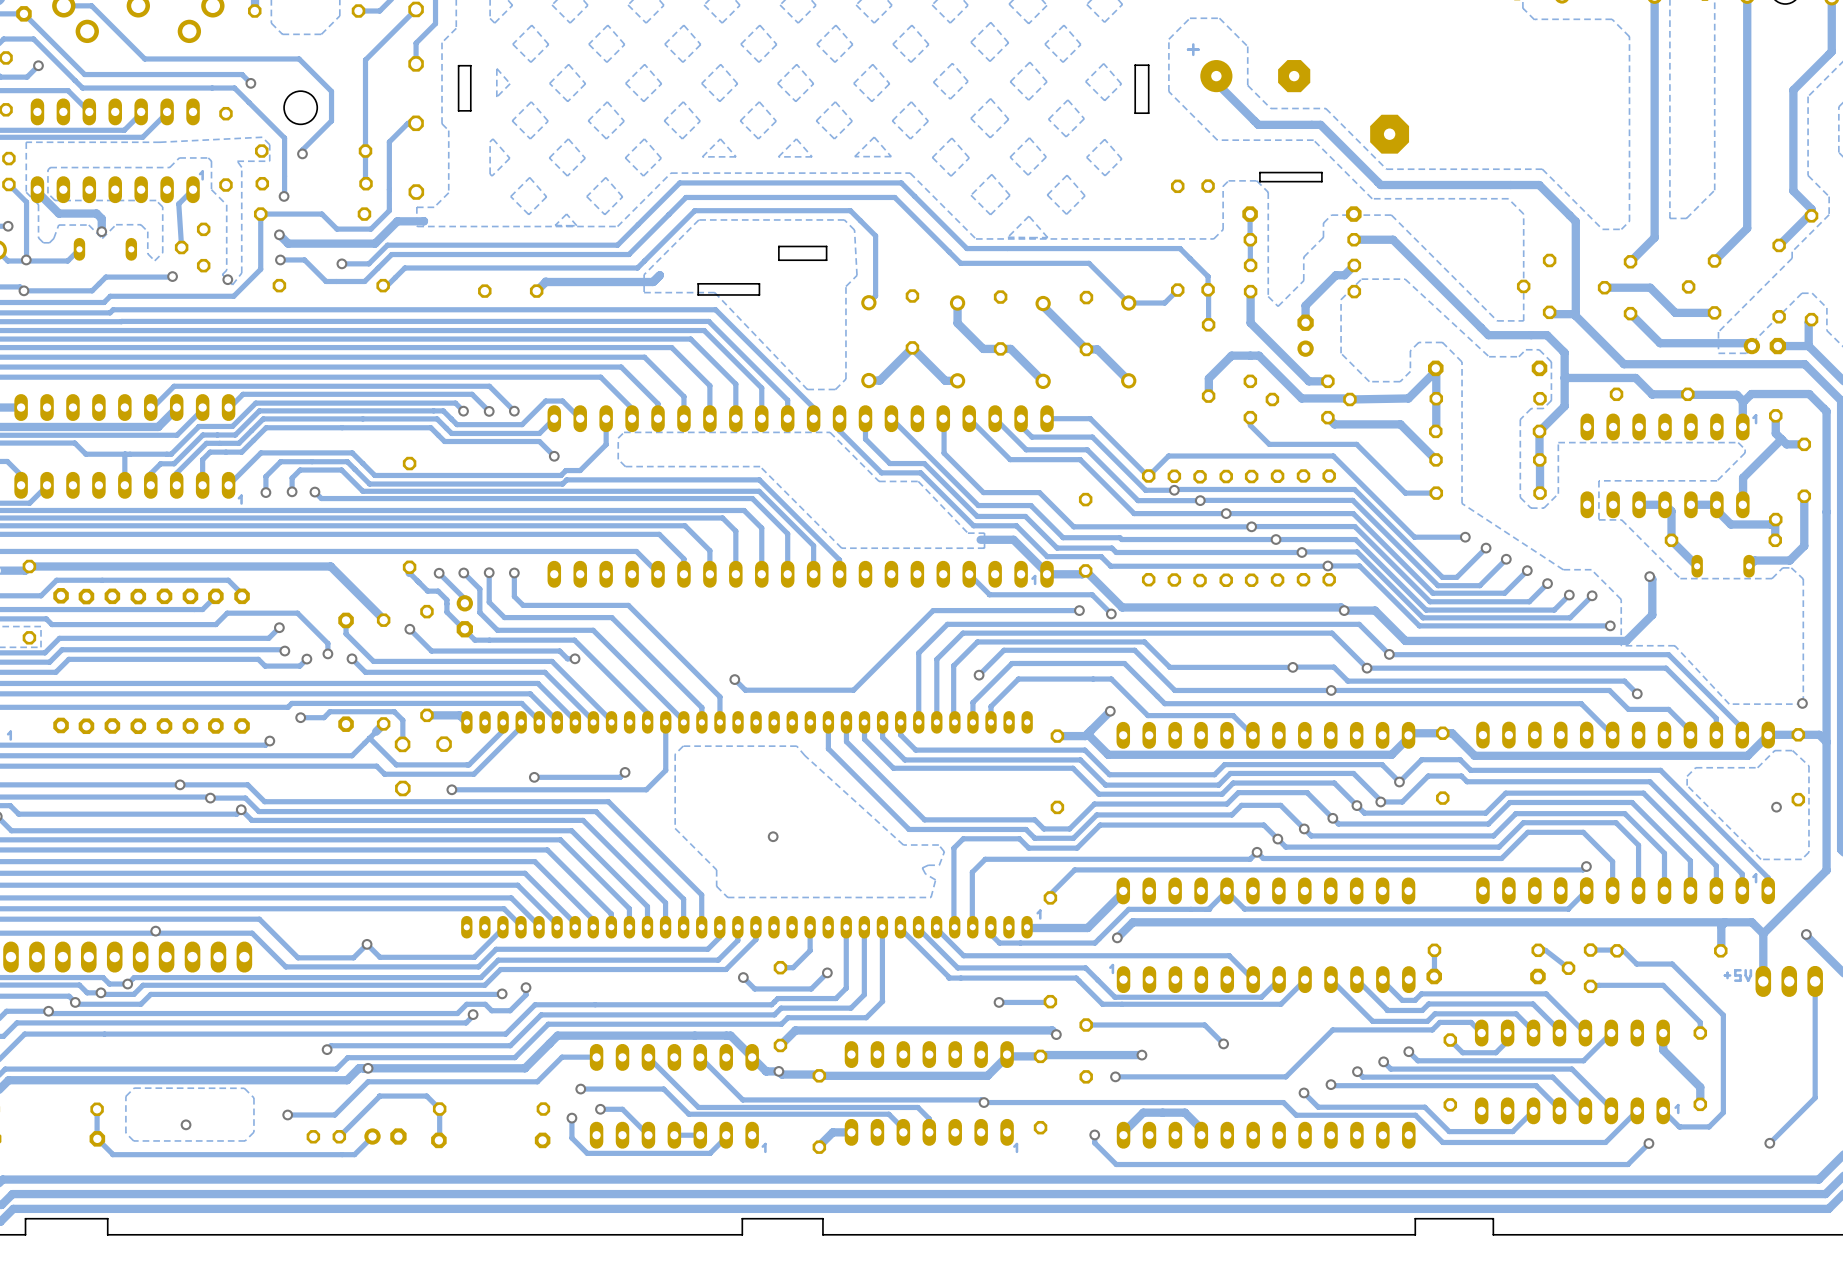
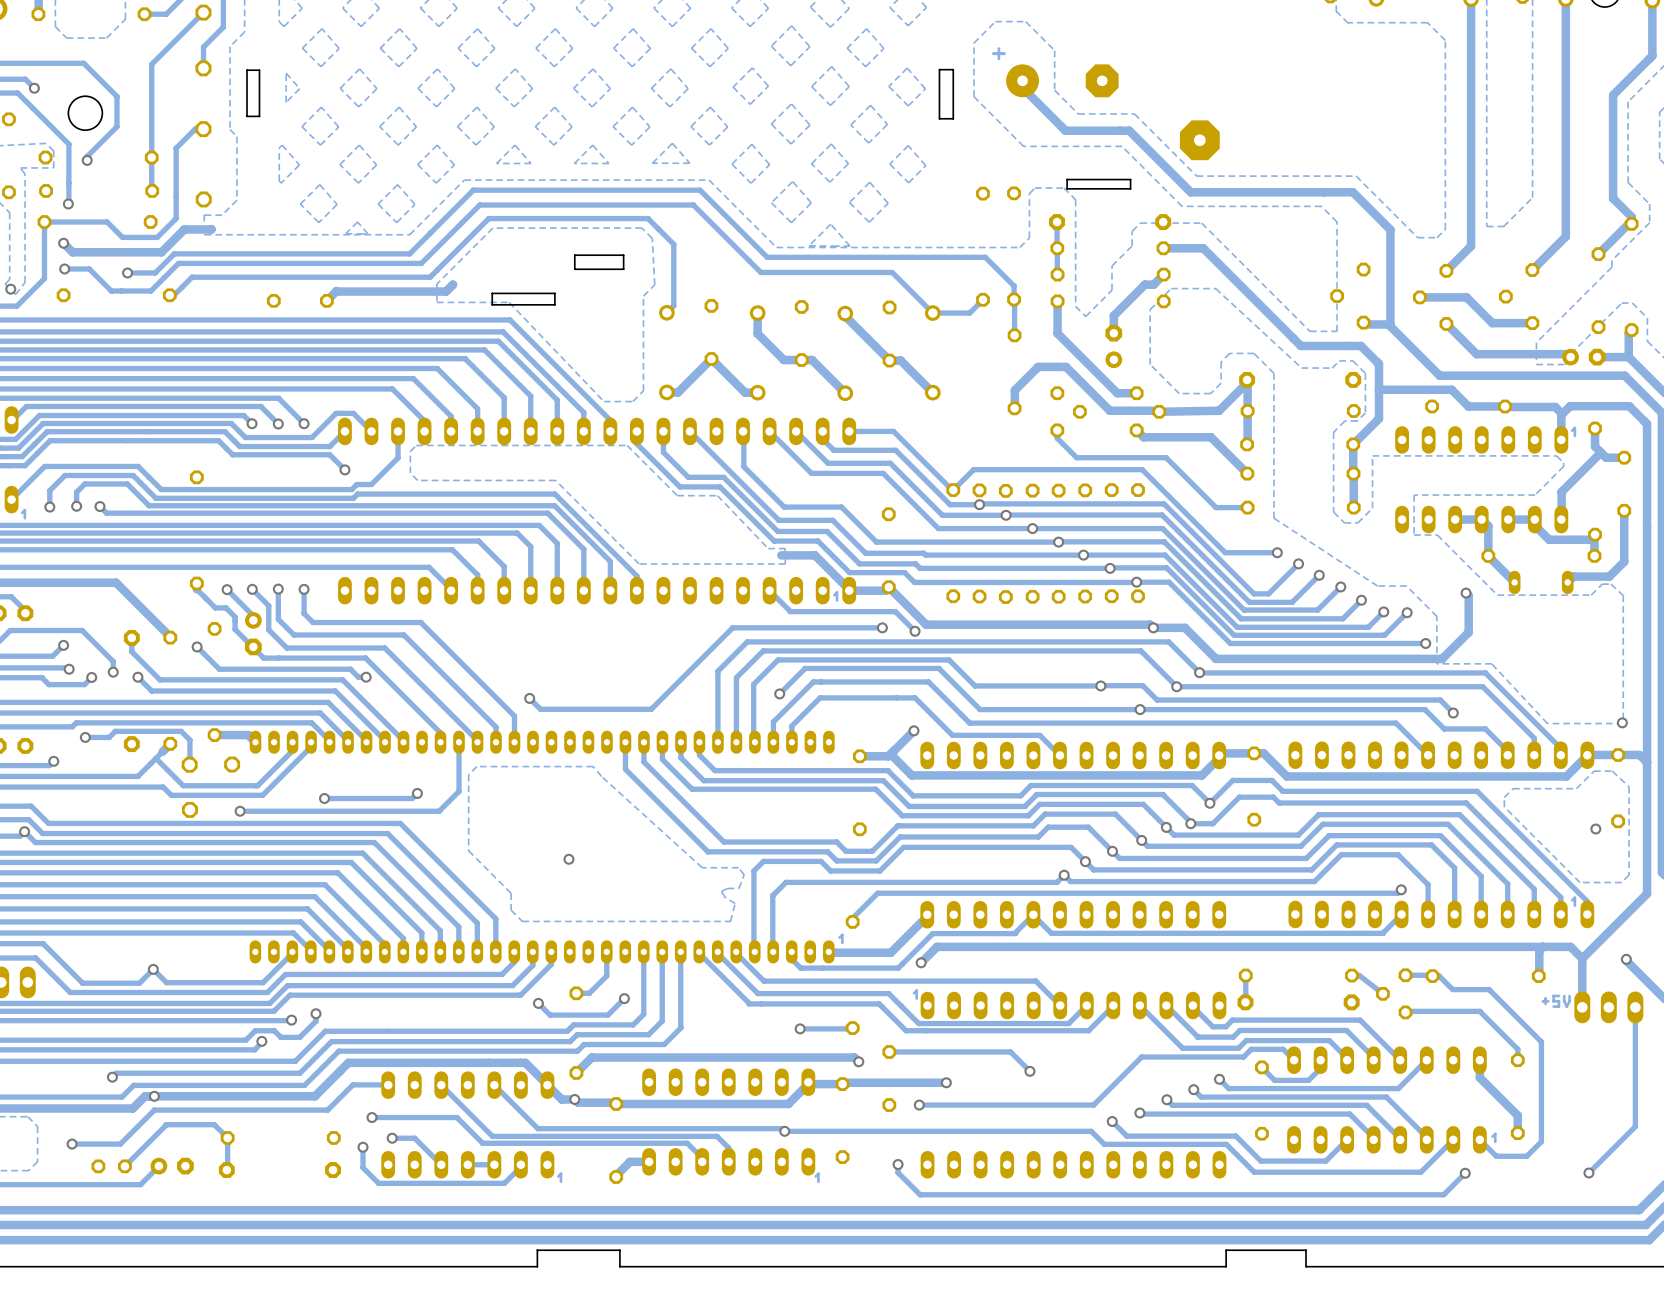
track: (1201, 1135) (1201, 1129) (1184, 1112) (1143, 1112) (1123, 1132) (1123, 1135) -> none

